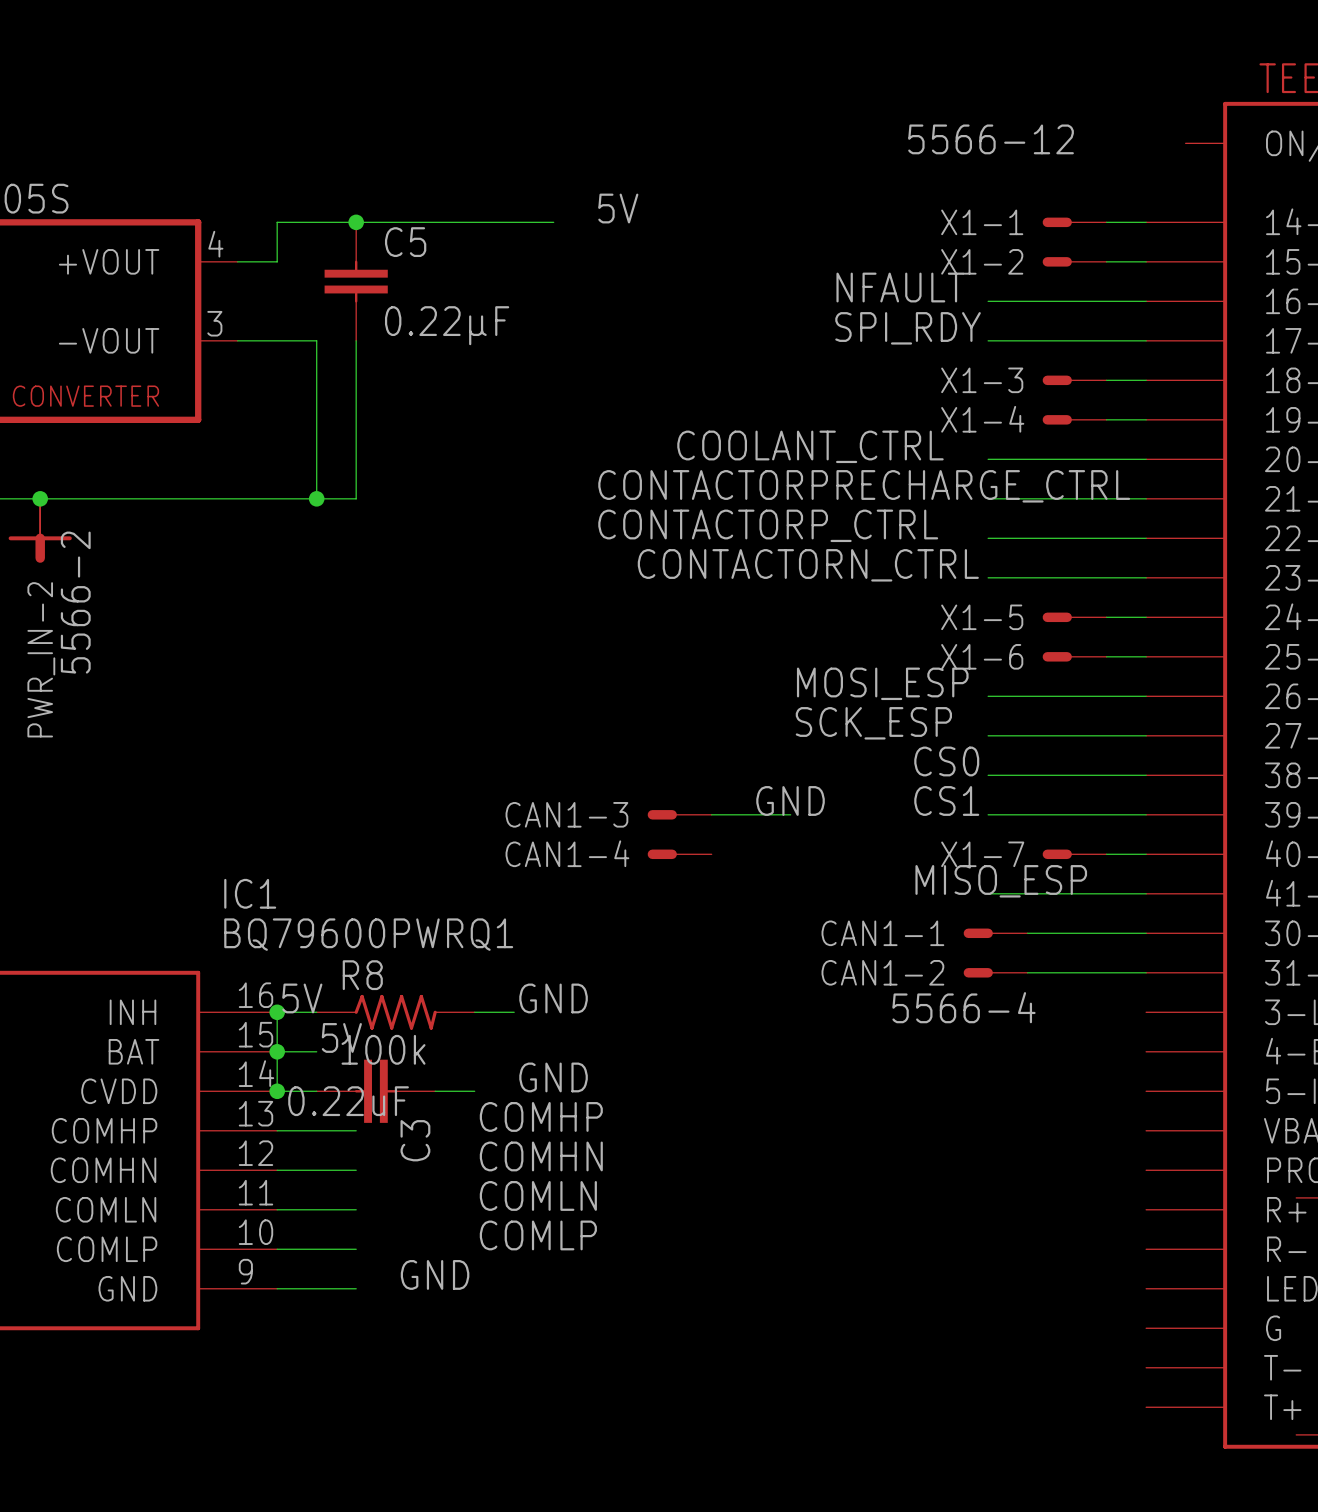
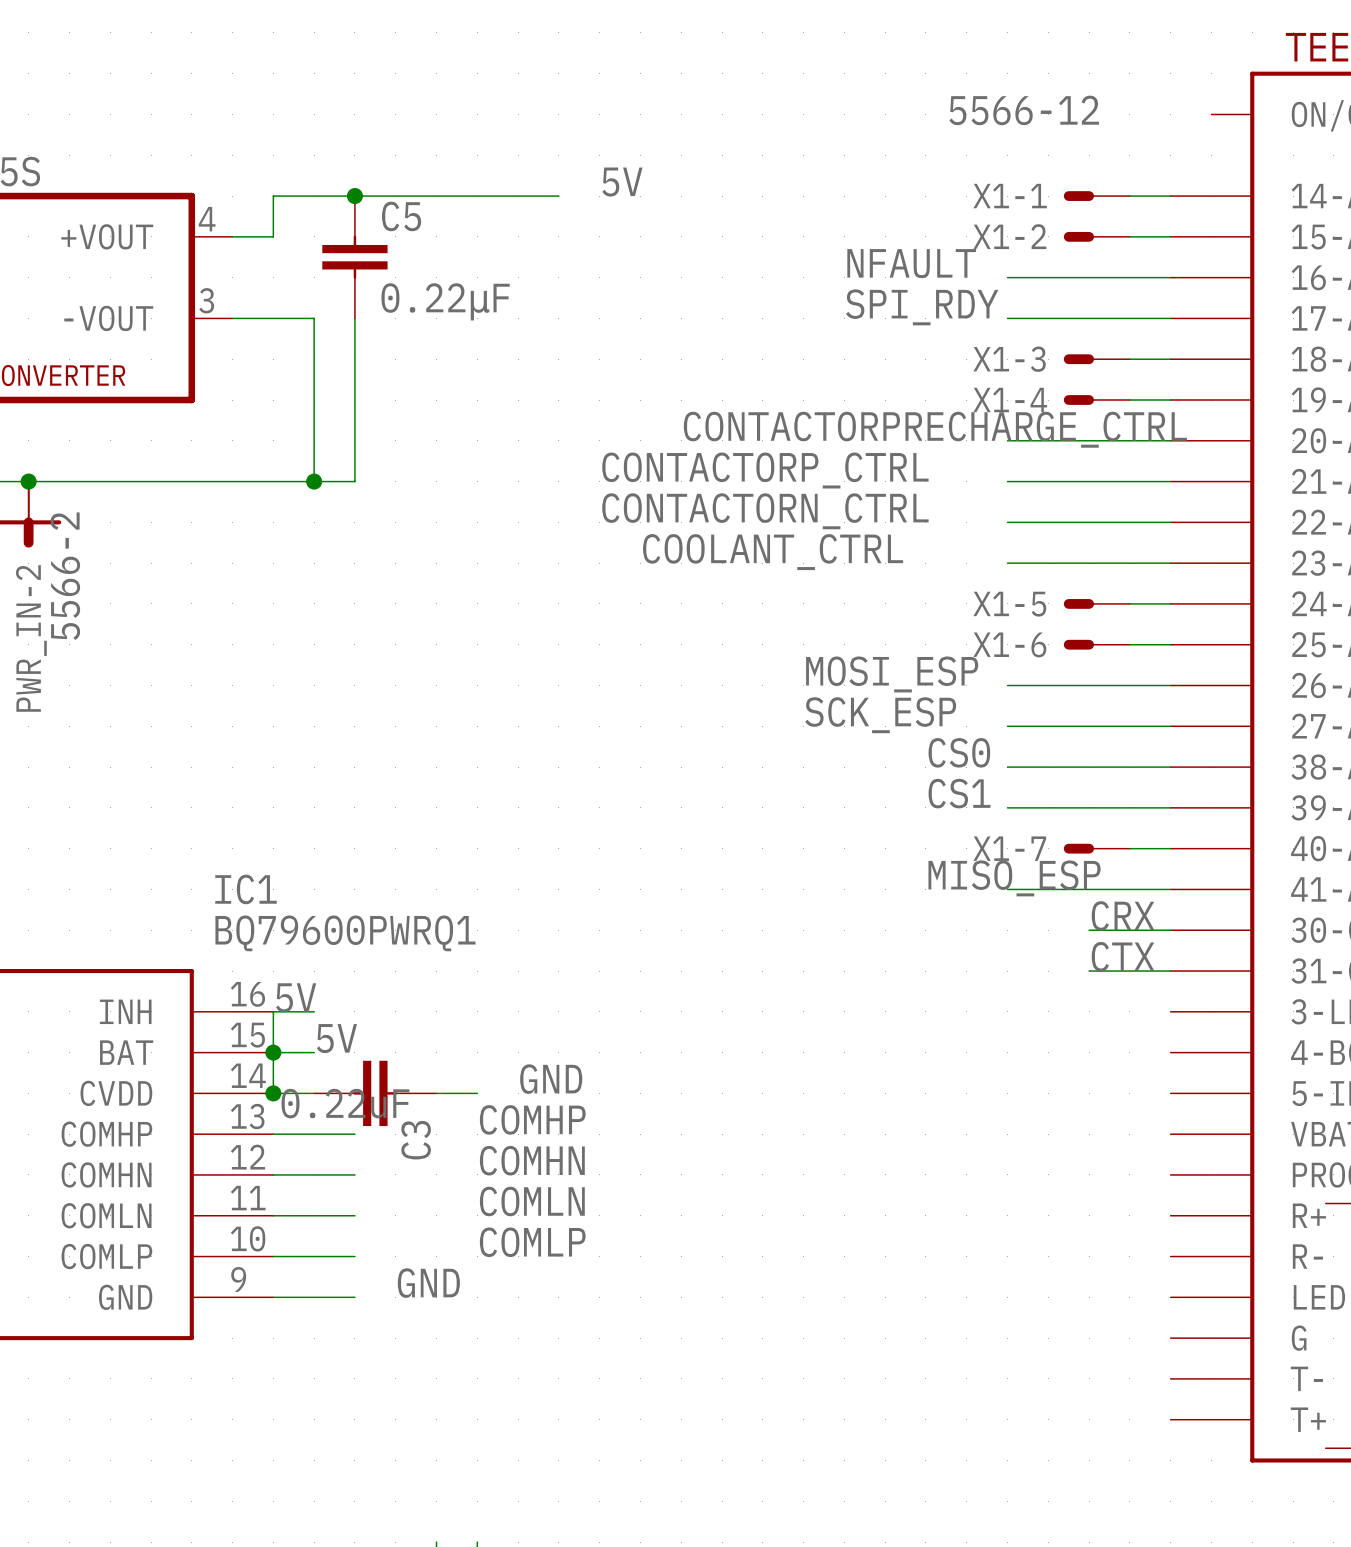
label: COOLANT_CTRL (810, 446) -> CONTACTORPRECHARGE_CTRL (935, 429)
label: CONTACTORPRECHARGE_CTRL (864, 486) -> CONTACTORP_CTRL (765, 470)
label: CONTACTORP_CTRL (768, 525) -> CONTACTORN_CTRL (765, 511)
label: CONTACTORN_CTRL (808, 565) -> COOLANT_CTRL (773, 552)
label: GND (790, 800) -> none
CAN1-3: (679, 814) -> none
wire: (711, 814) (790, 814) -> none
CAN1-4: (679, 854) -> none
label: none -> CRX (1123, 915)
CAN1-1: 5566-4 (995, 933) -> none
wire: (1027, 933) (1067, 933) -> none
label: none -> CTX (1123, 956)
CAN1-2: (995, 972) -> none
wire: (1027, 972) (1067, 972) -> none
label: GND (553, 998) -> none
junction: (277, 1012) -> none
R8: 100k (395, 1012) -> none
wire: (474, 1012) (514, 1012) -> none

